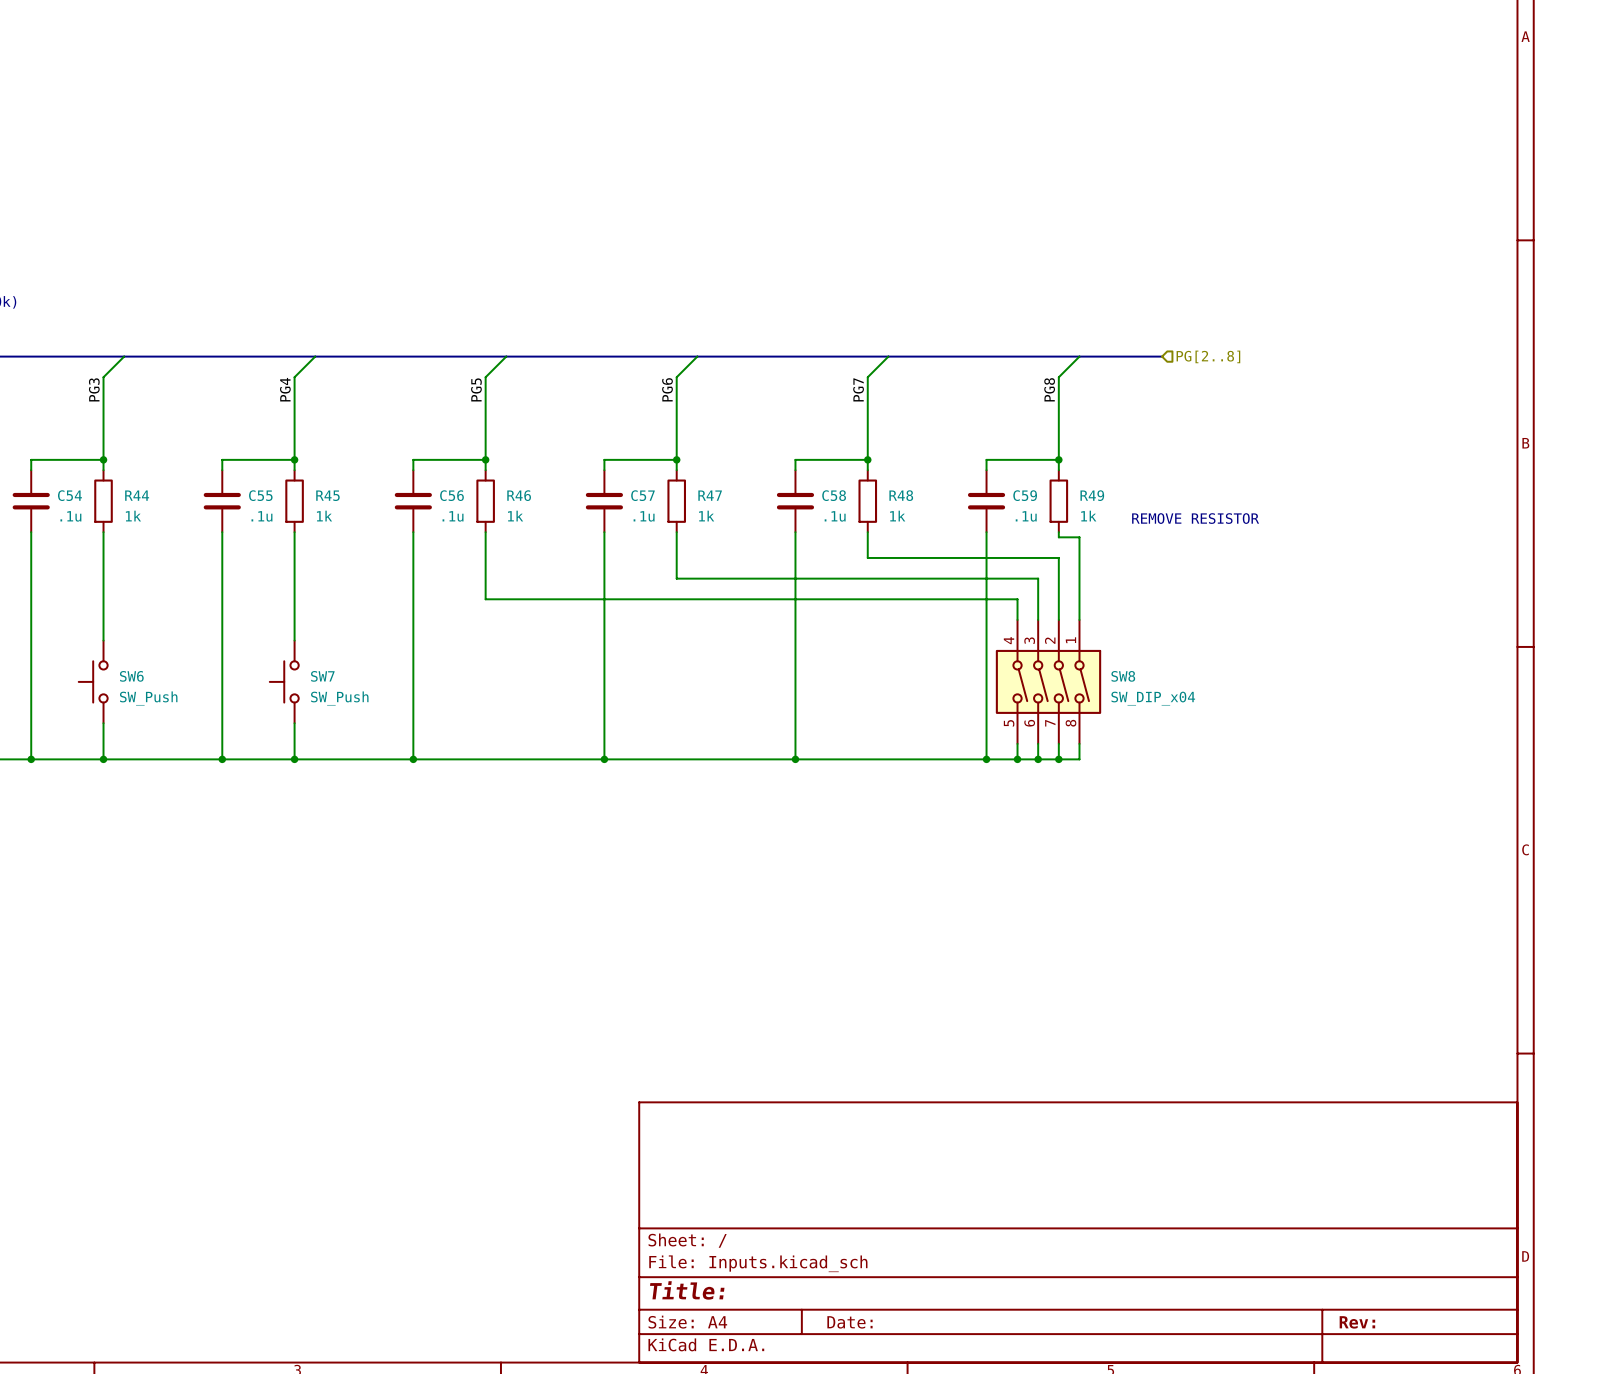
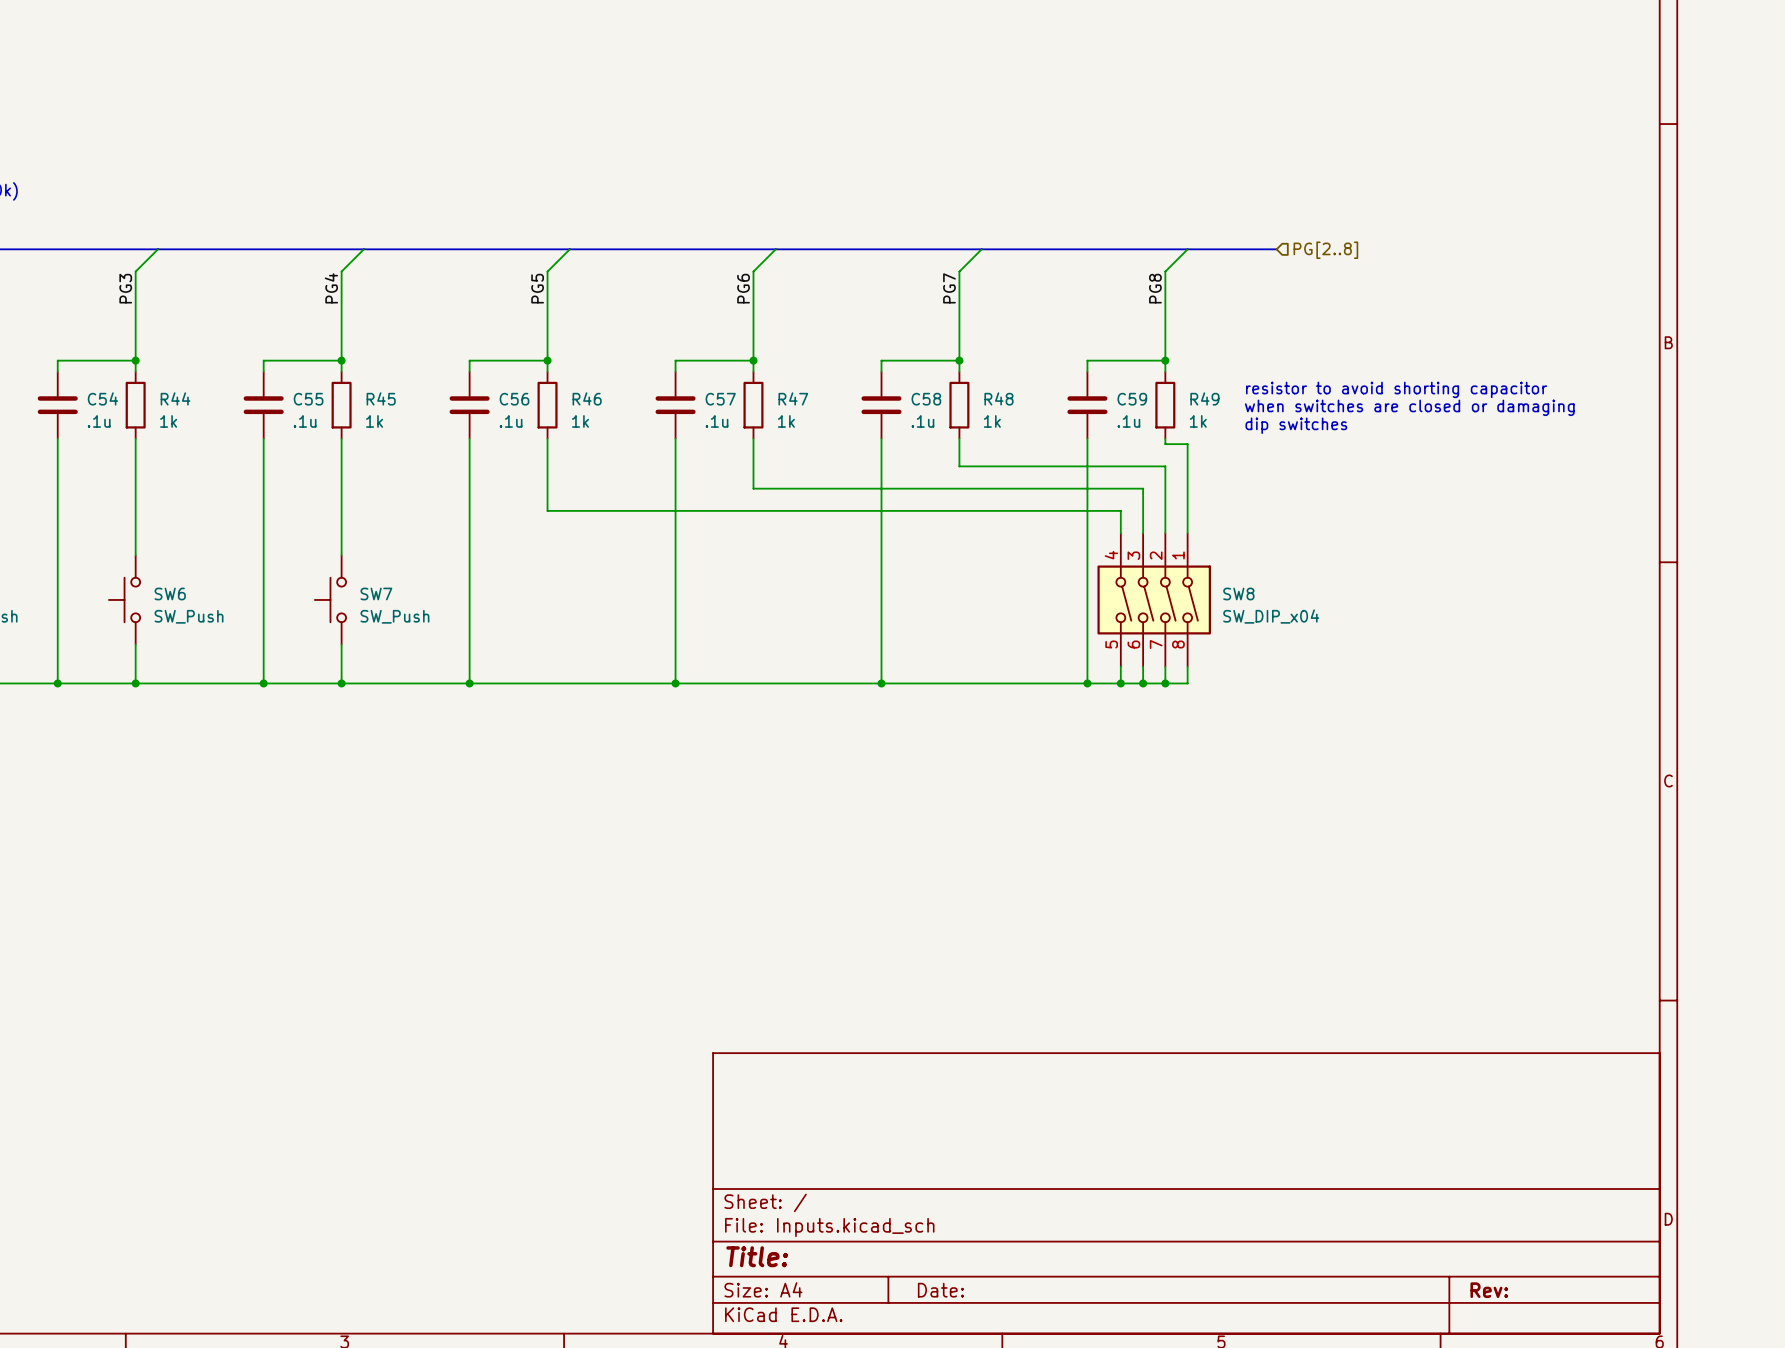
text: none -> resistor to avoid shorting capacitor (1396, 389)
text: none -> when switches are closed or damaging (1409, 407)
text: REMOVE RESISTOR (1195, 518) -> dip switches (1296, 425)

